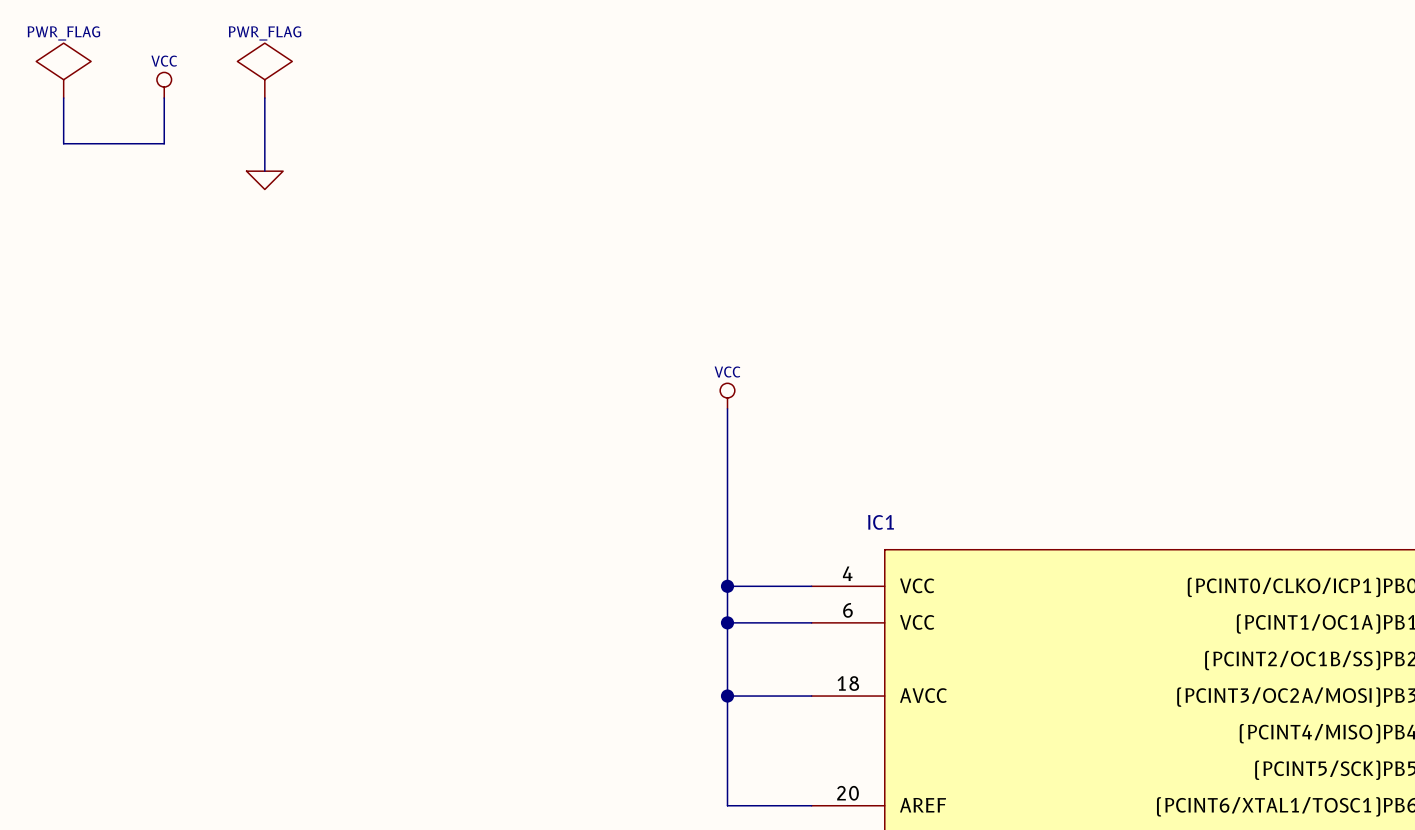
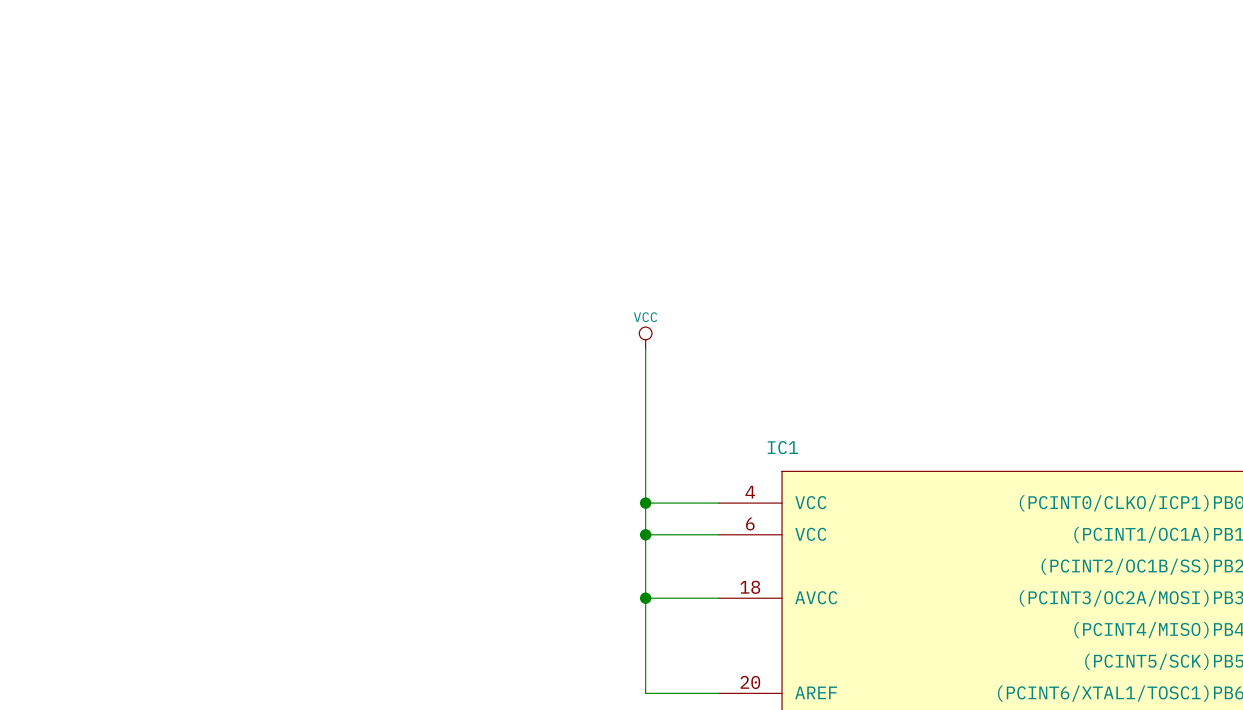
power symbol: PWR_FLAG (63, 70) -> none
power symbol: PWR_FLAG (264, 70) -> none
power symbol: VCC (164, 85) -> none
wire: (63, 98) (63, 143) (164, 143) (164, 98) -> none
wire: (264, 98) (264, 171) -> none
power symbol: (264, 180) -> none

